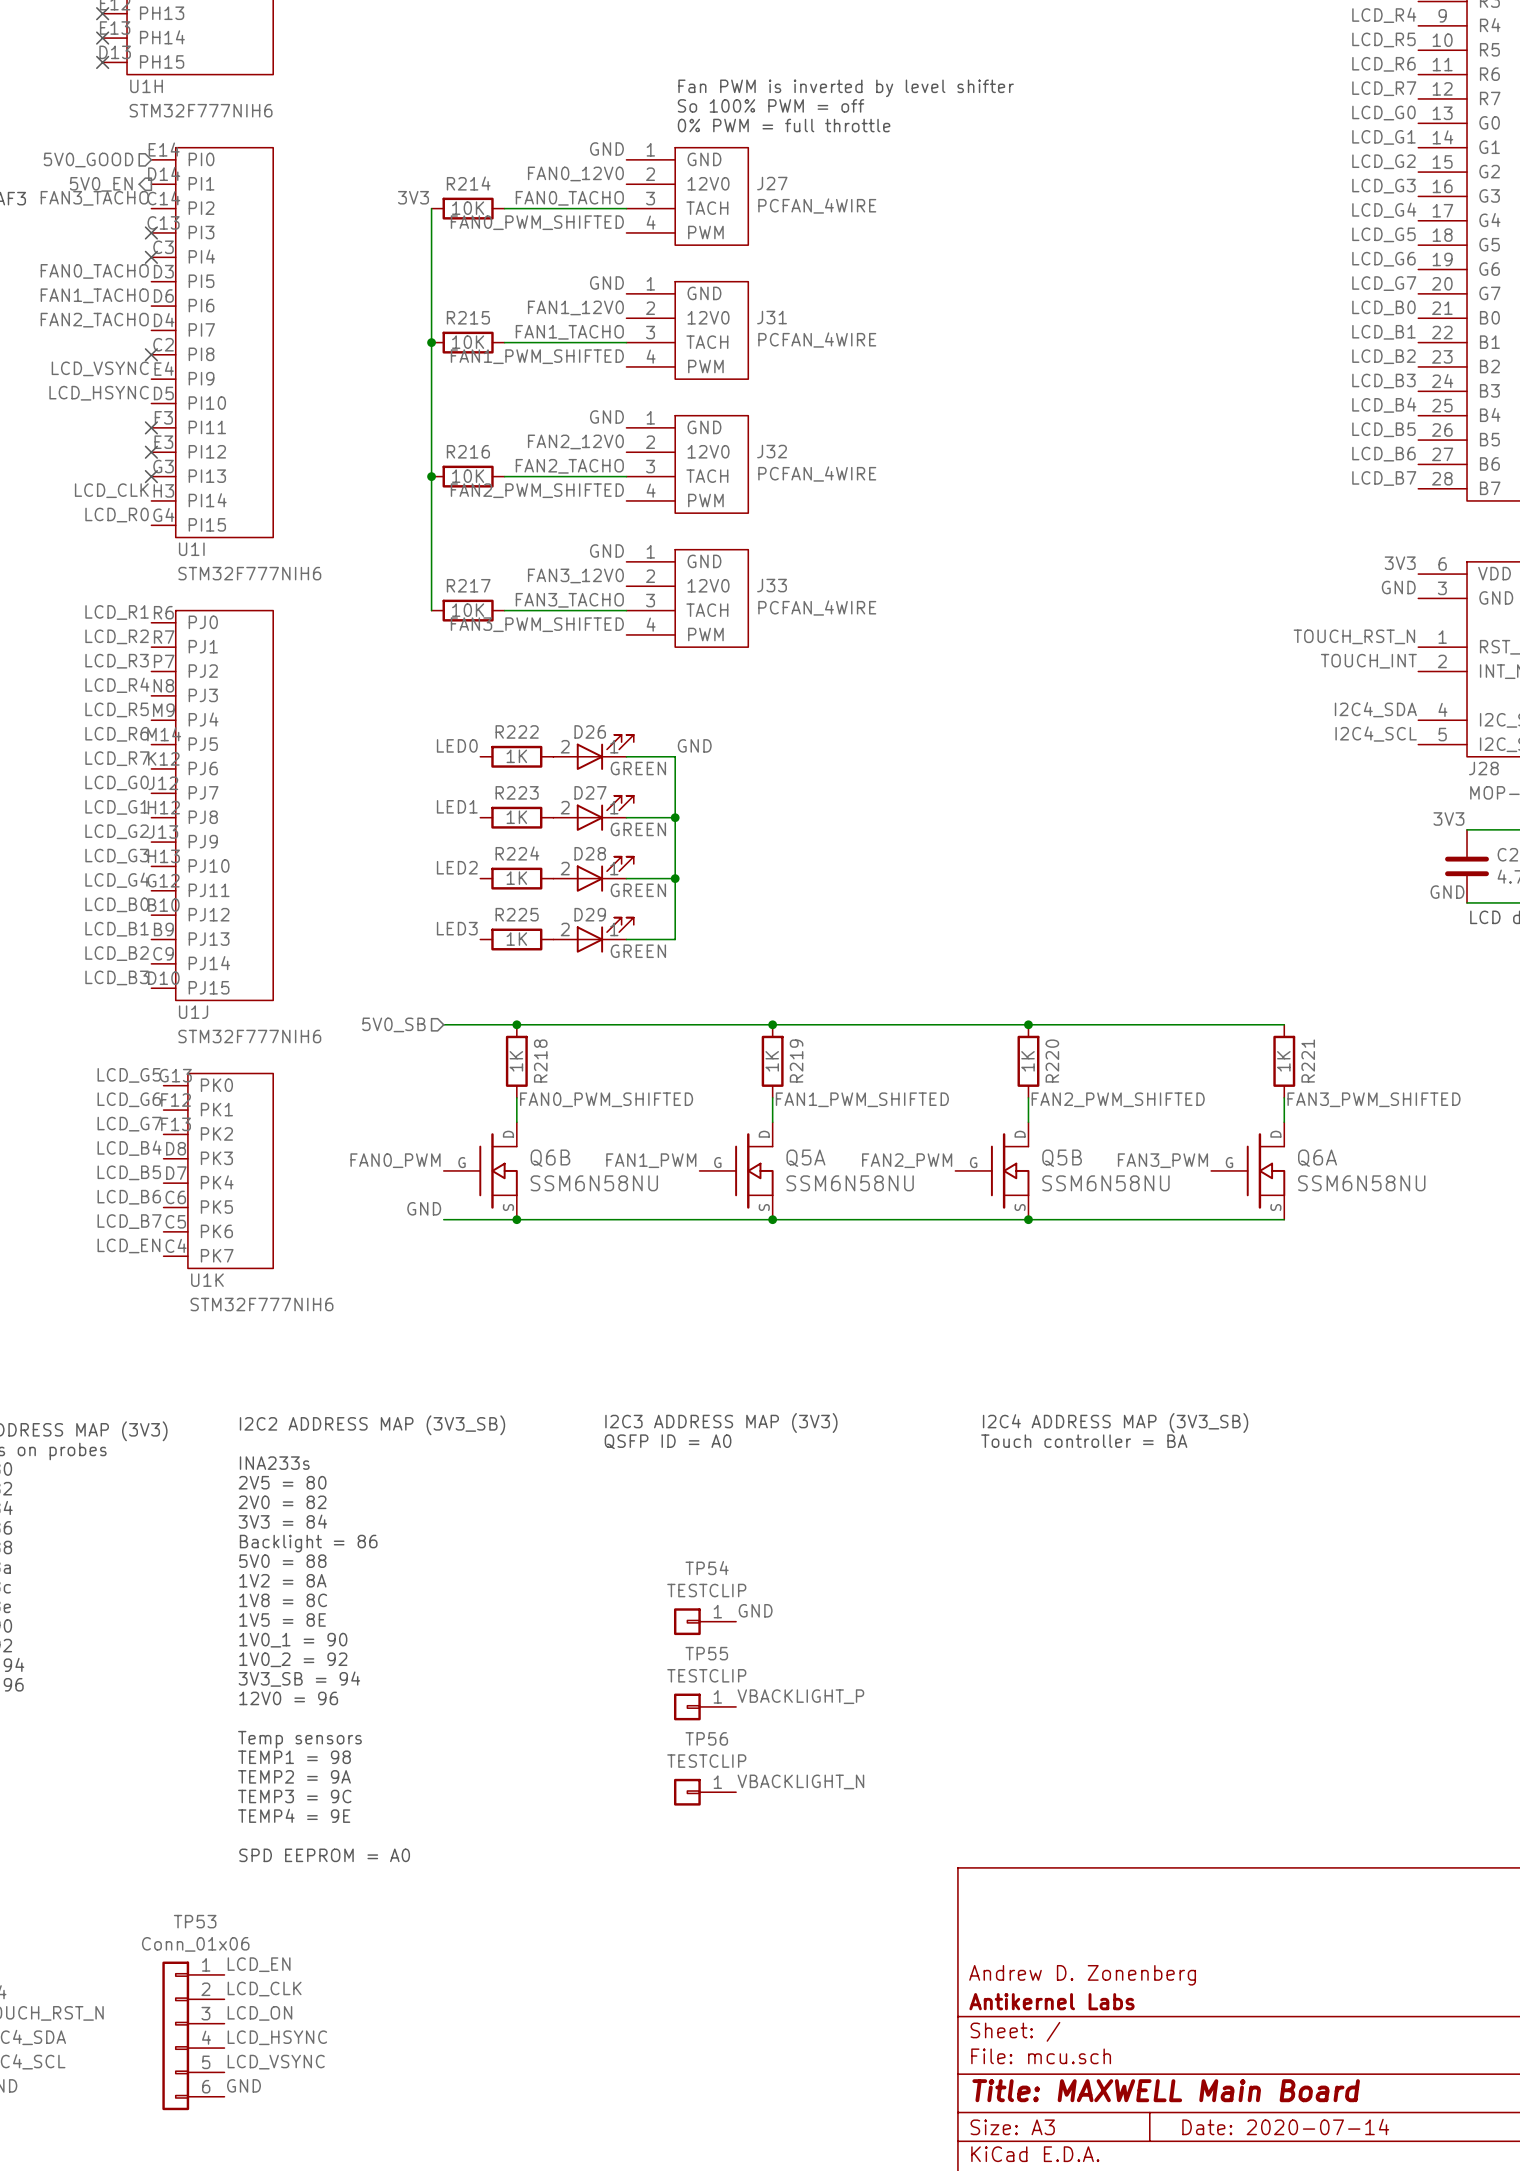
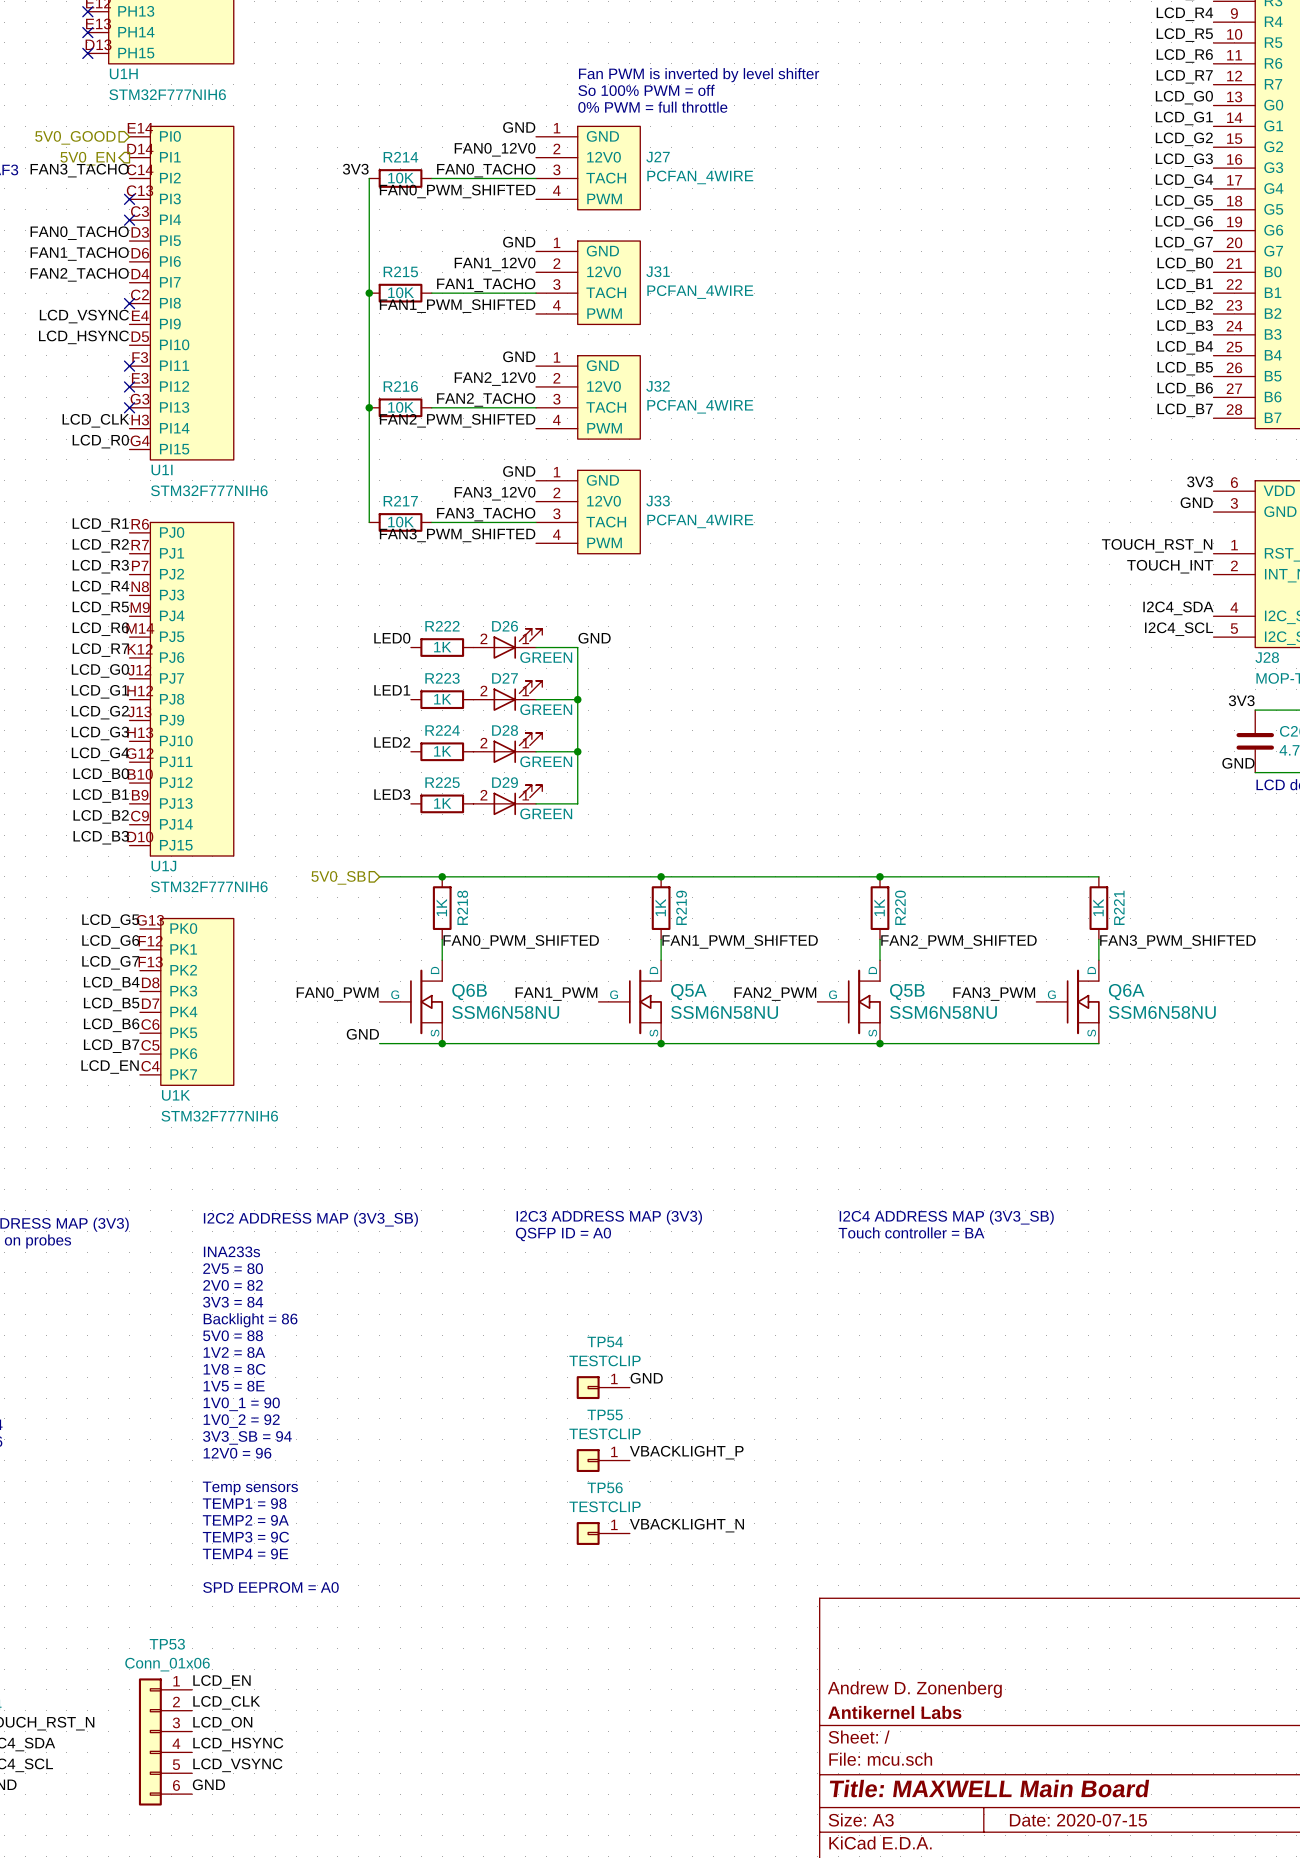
title block: Date: 2020-07-14 (1285, 2126) -> Date: 2020-07-15 (1078, 1820)

